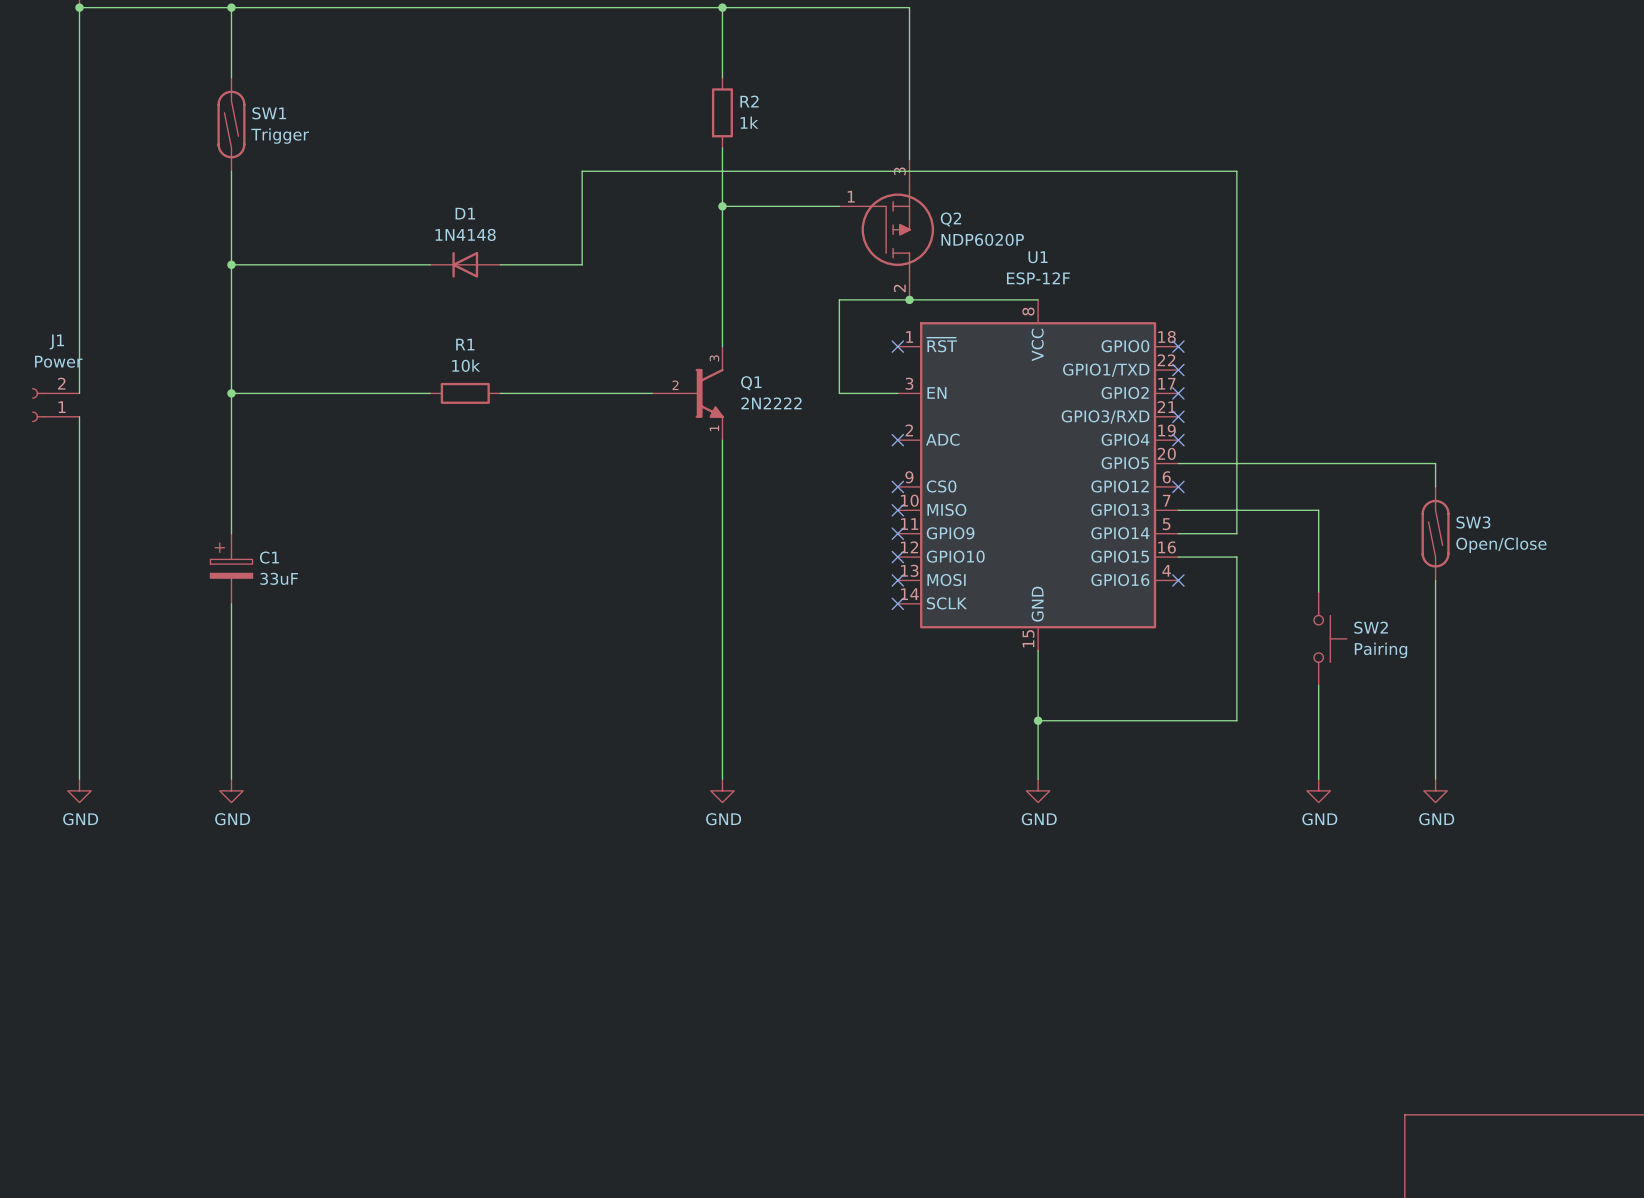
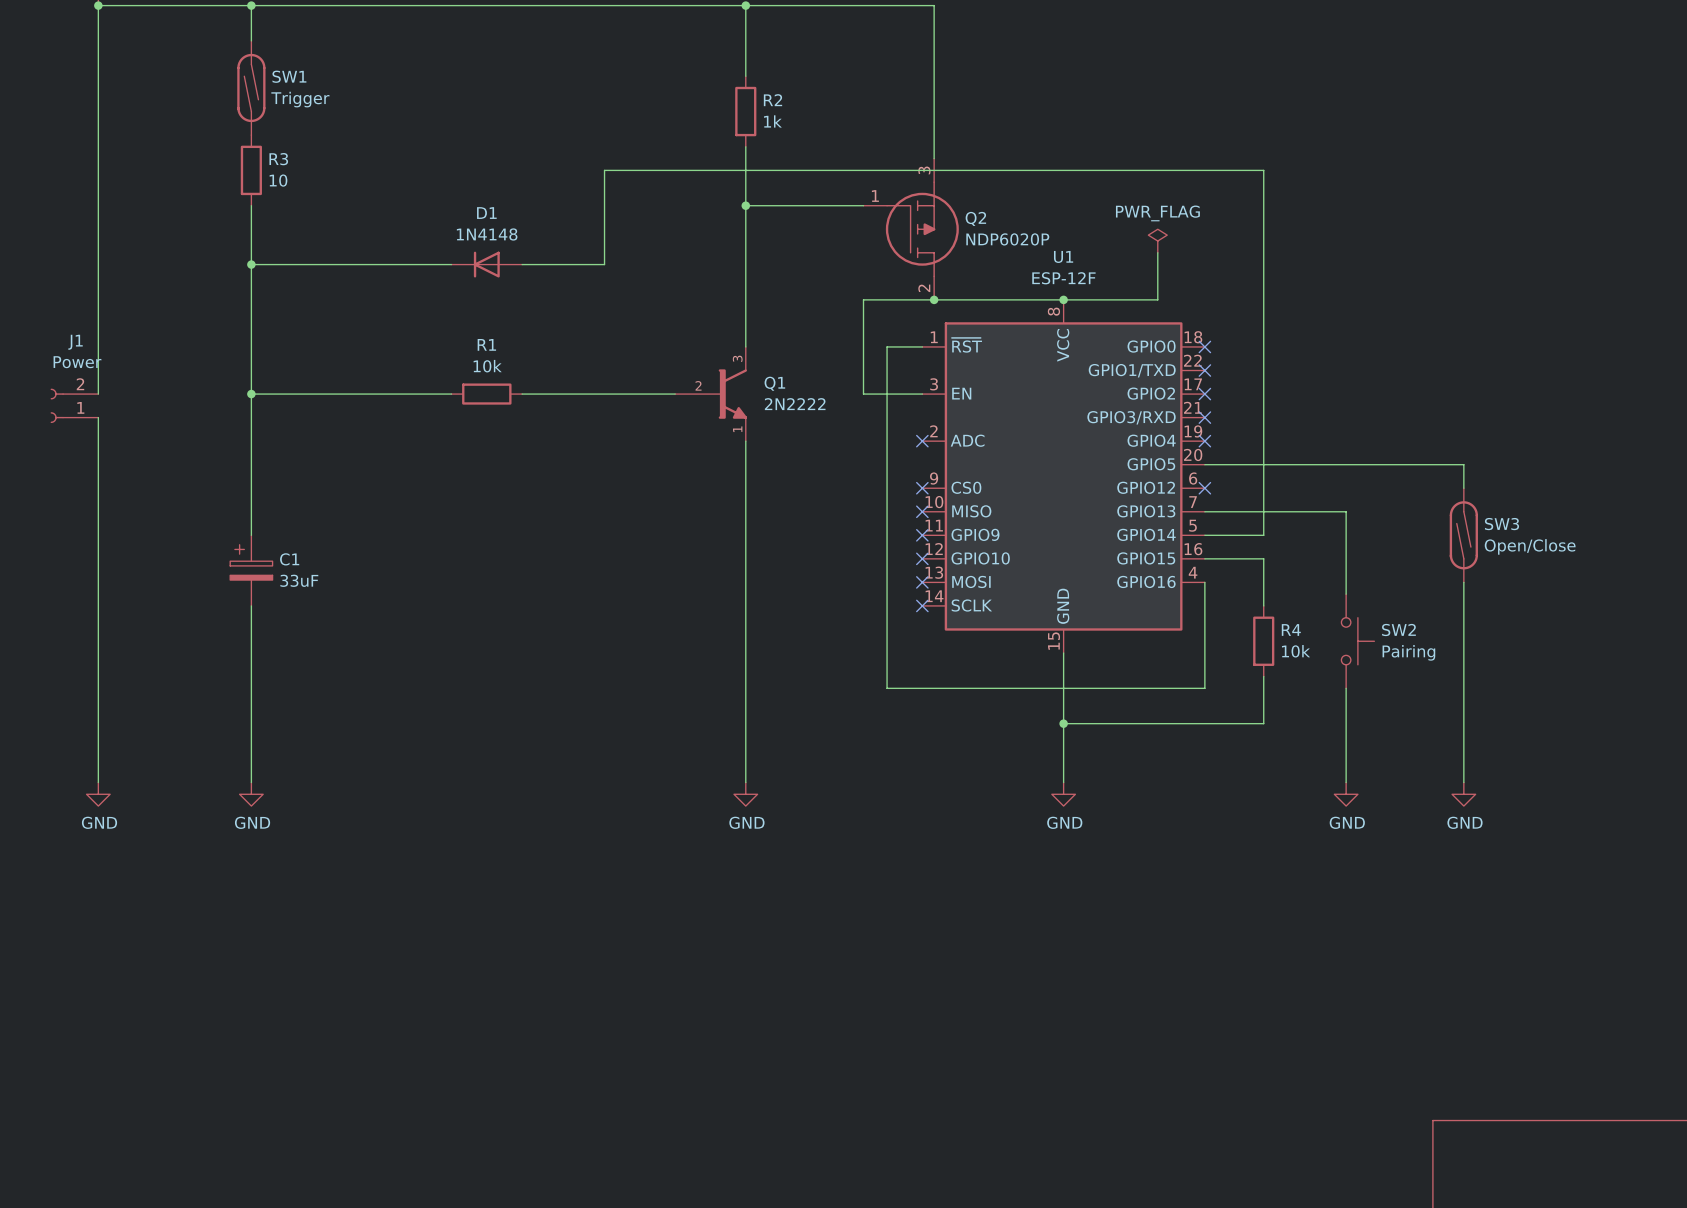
SW1 position: (231, 124) -> (251, 88)
wire: (231, 171) (231, 206) -> none
R3: none -> 10 (251, 170)
power symbol: none -> PWR_FLAG (1157, 241)
wire: none -> (1157, 252) (1157, 299) (1063, 299)
junction: none -> (1063, 299)
wire: none -> (922, 346) (887, 346) (887, 688) (1204, 688) (1204, 582)
no-connect mark: (897, 346) -> none
no-connect mark: (1178, 580) -> none
wire: (1236, 603) (1236, 673) -> none
R4: none -> 10k (1263, 641)

